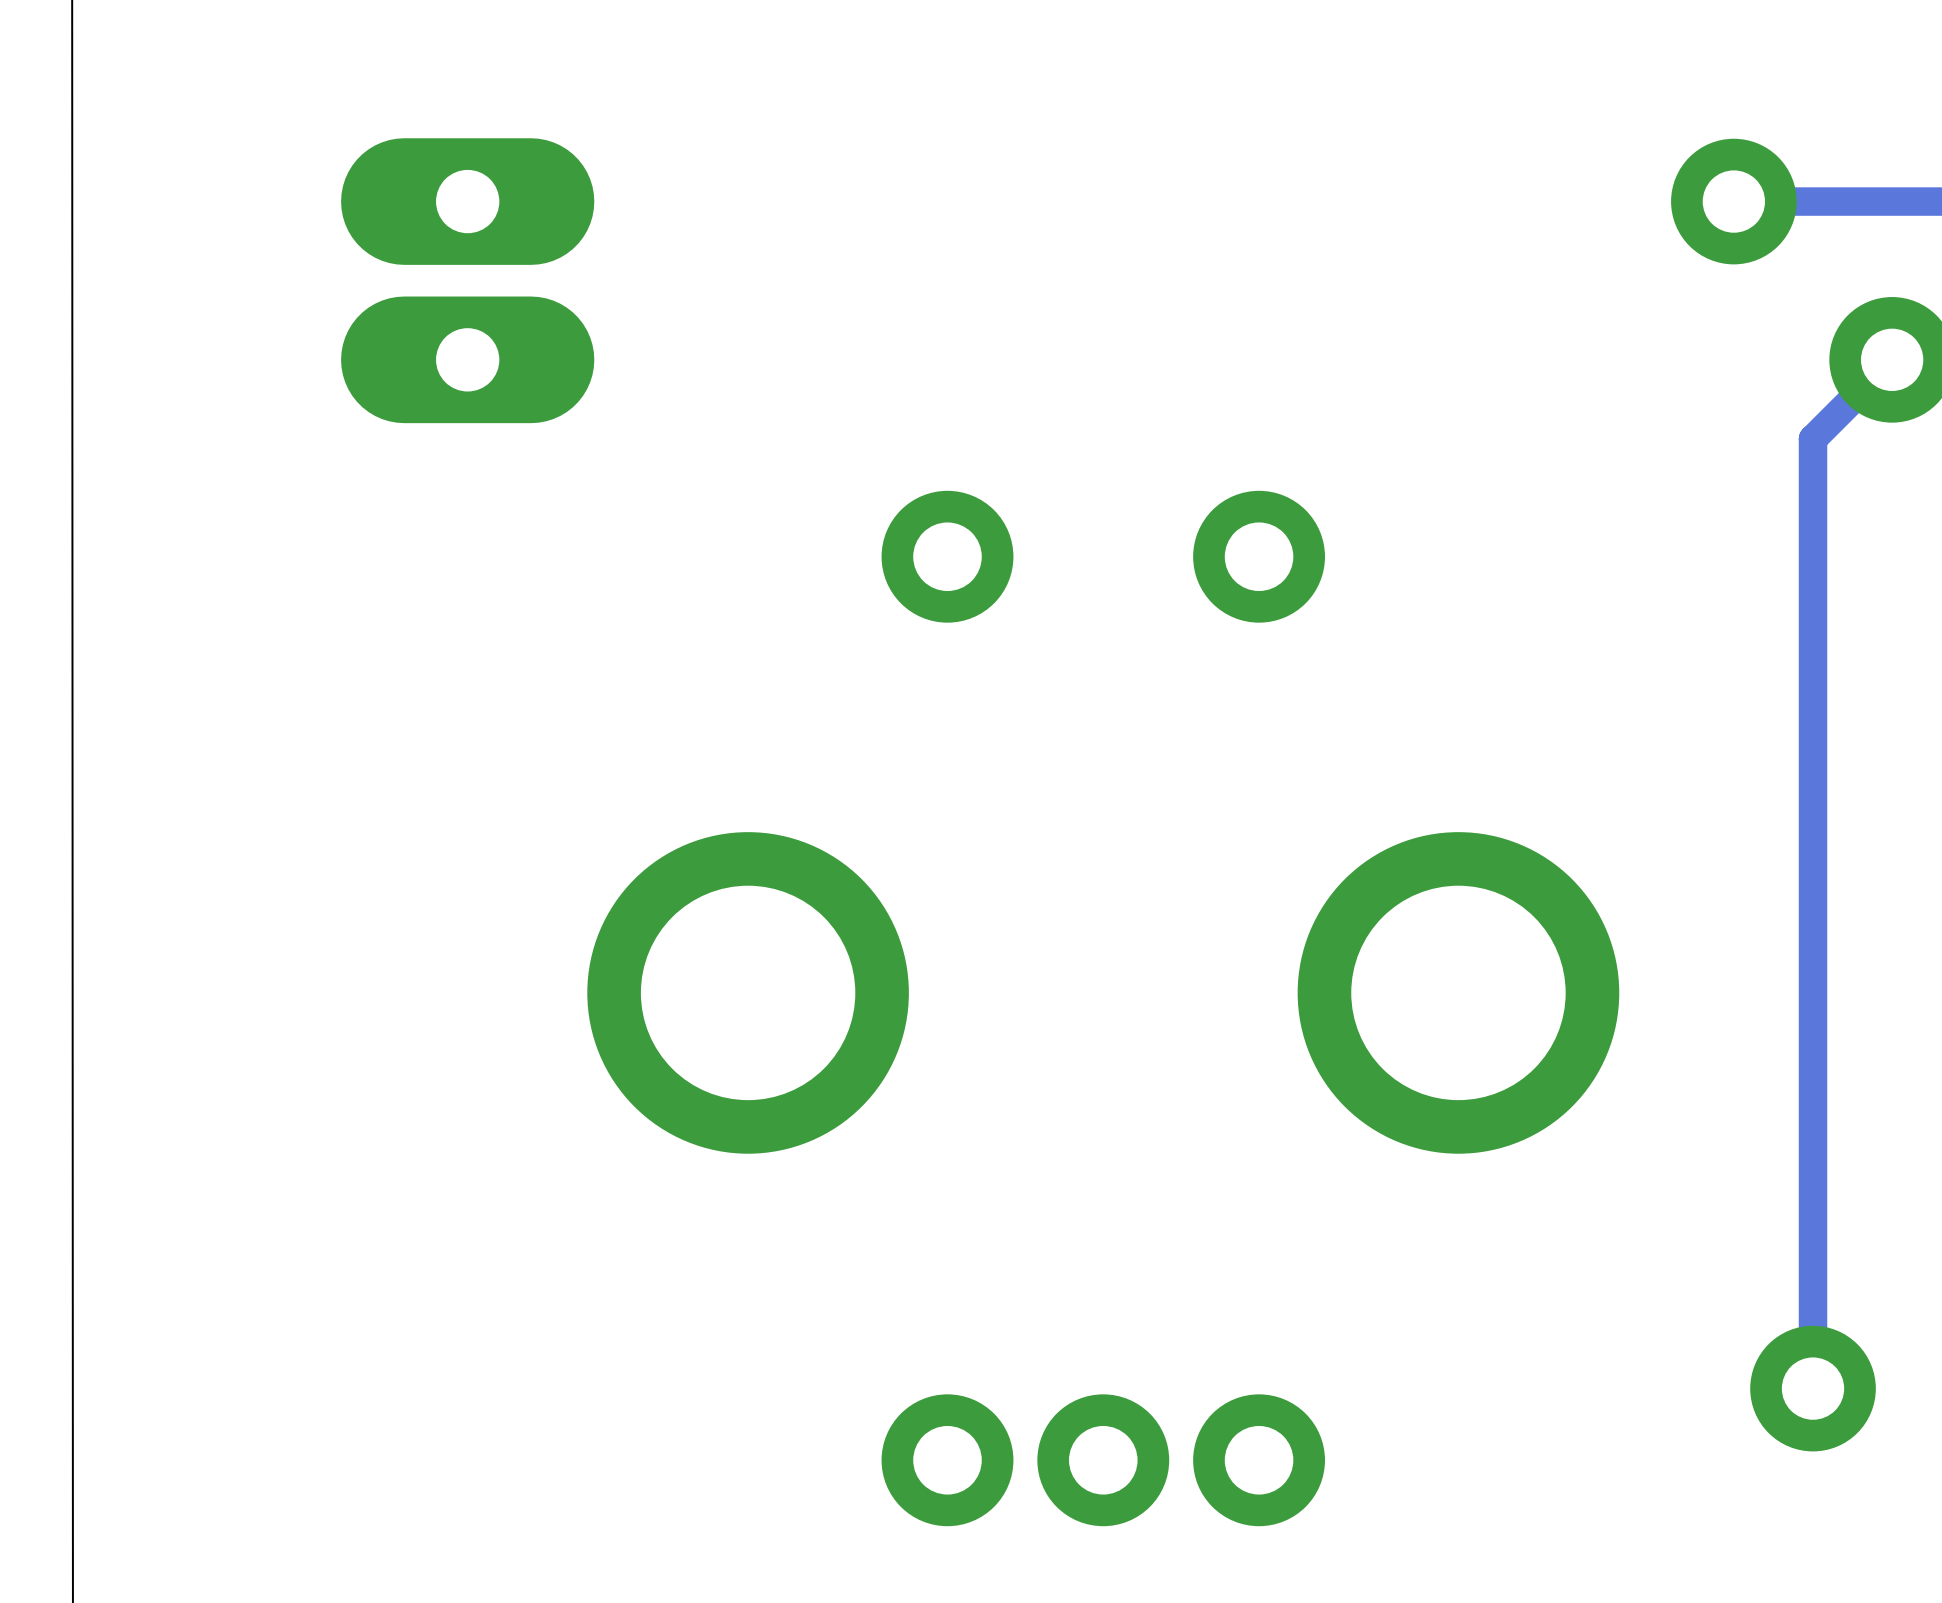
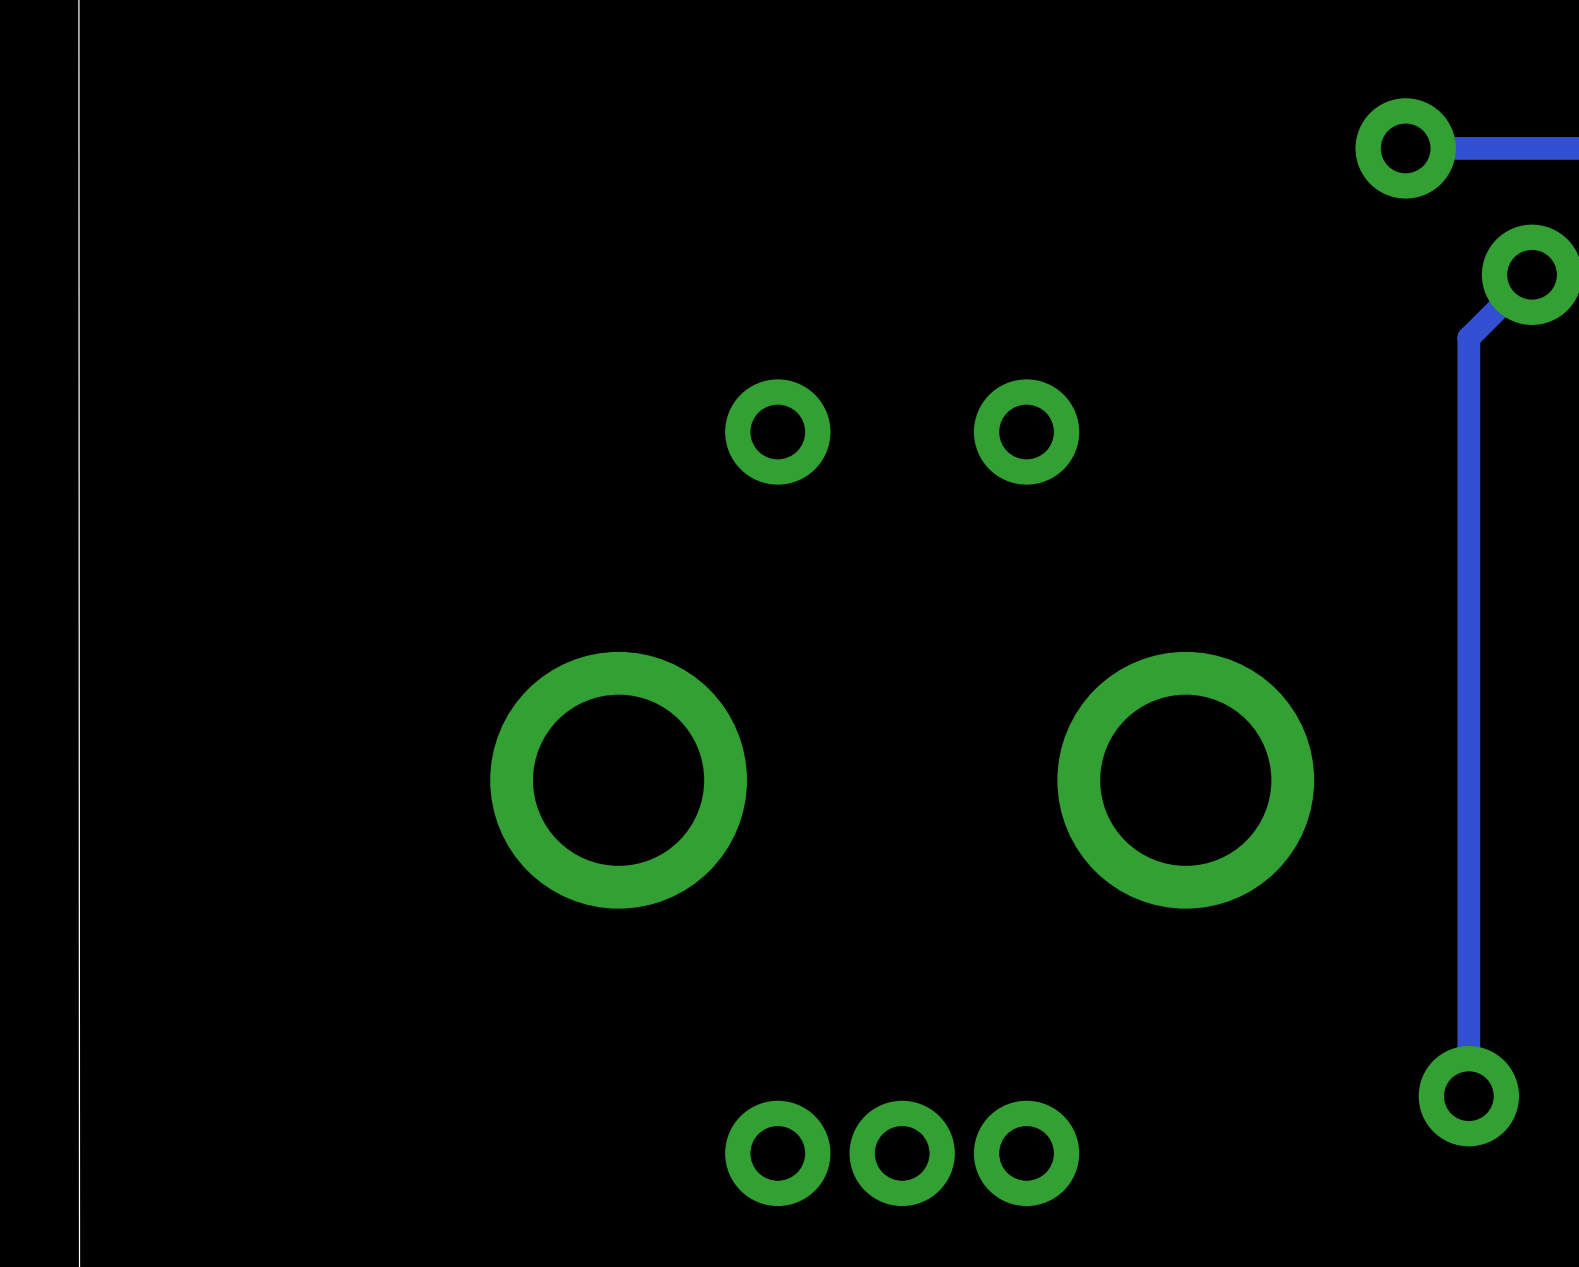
part: (467, 280) -> none

